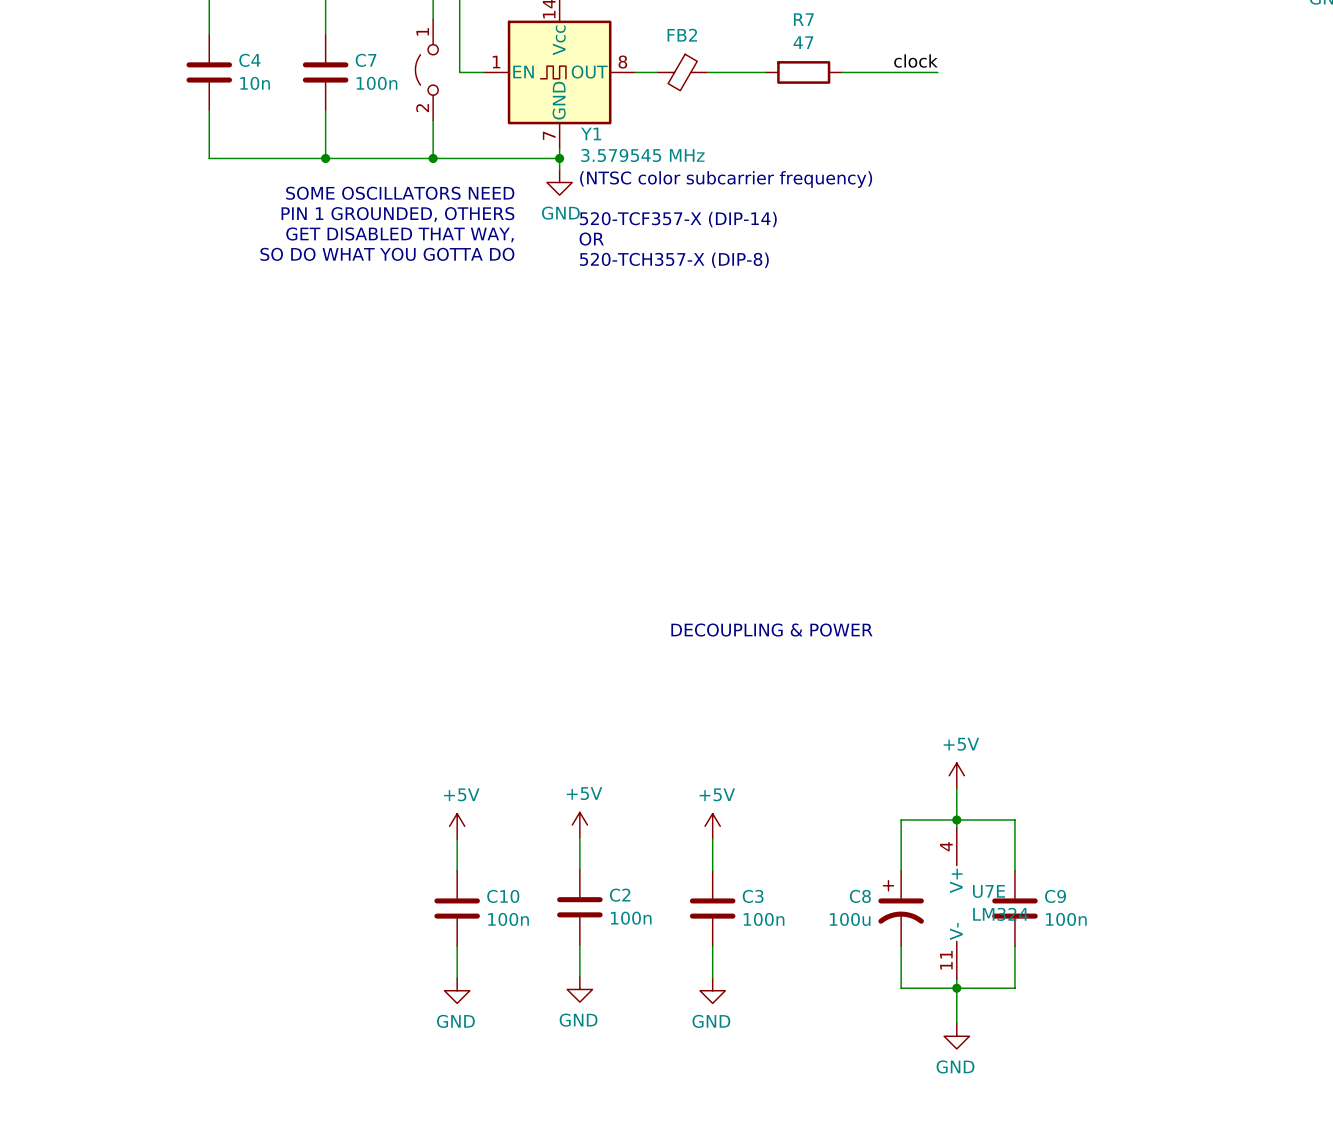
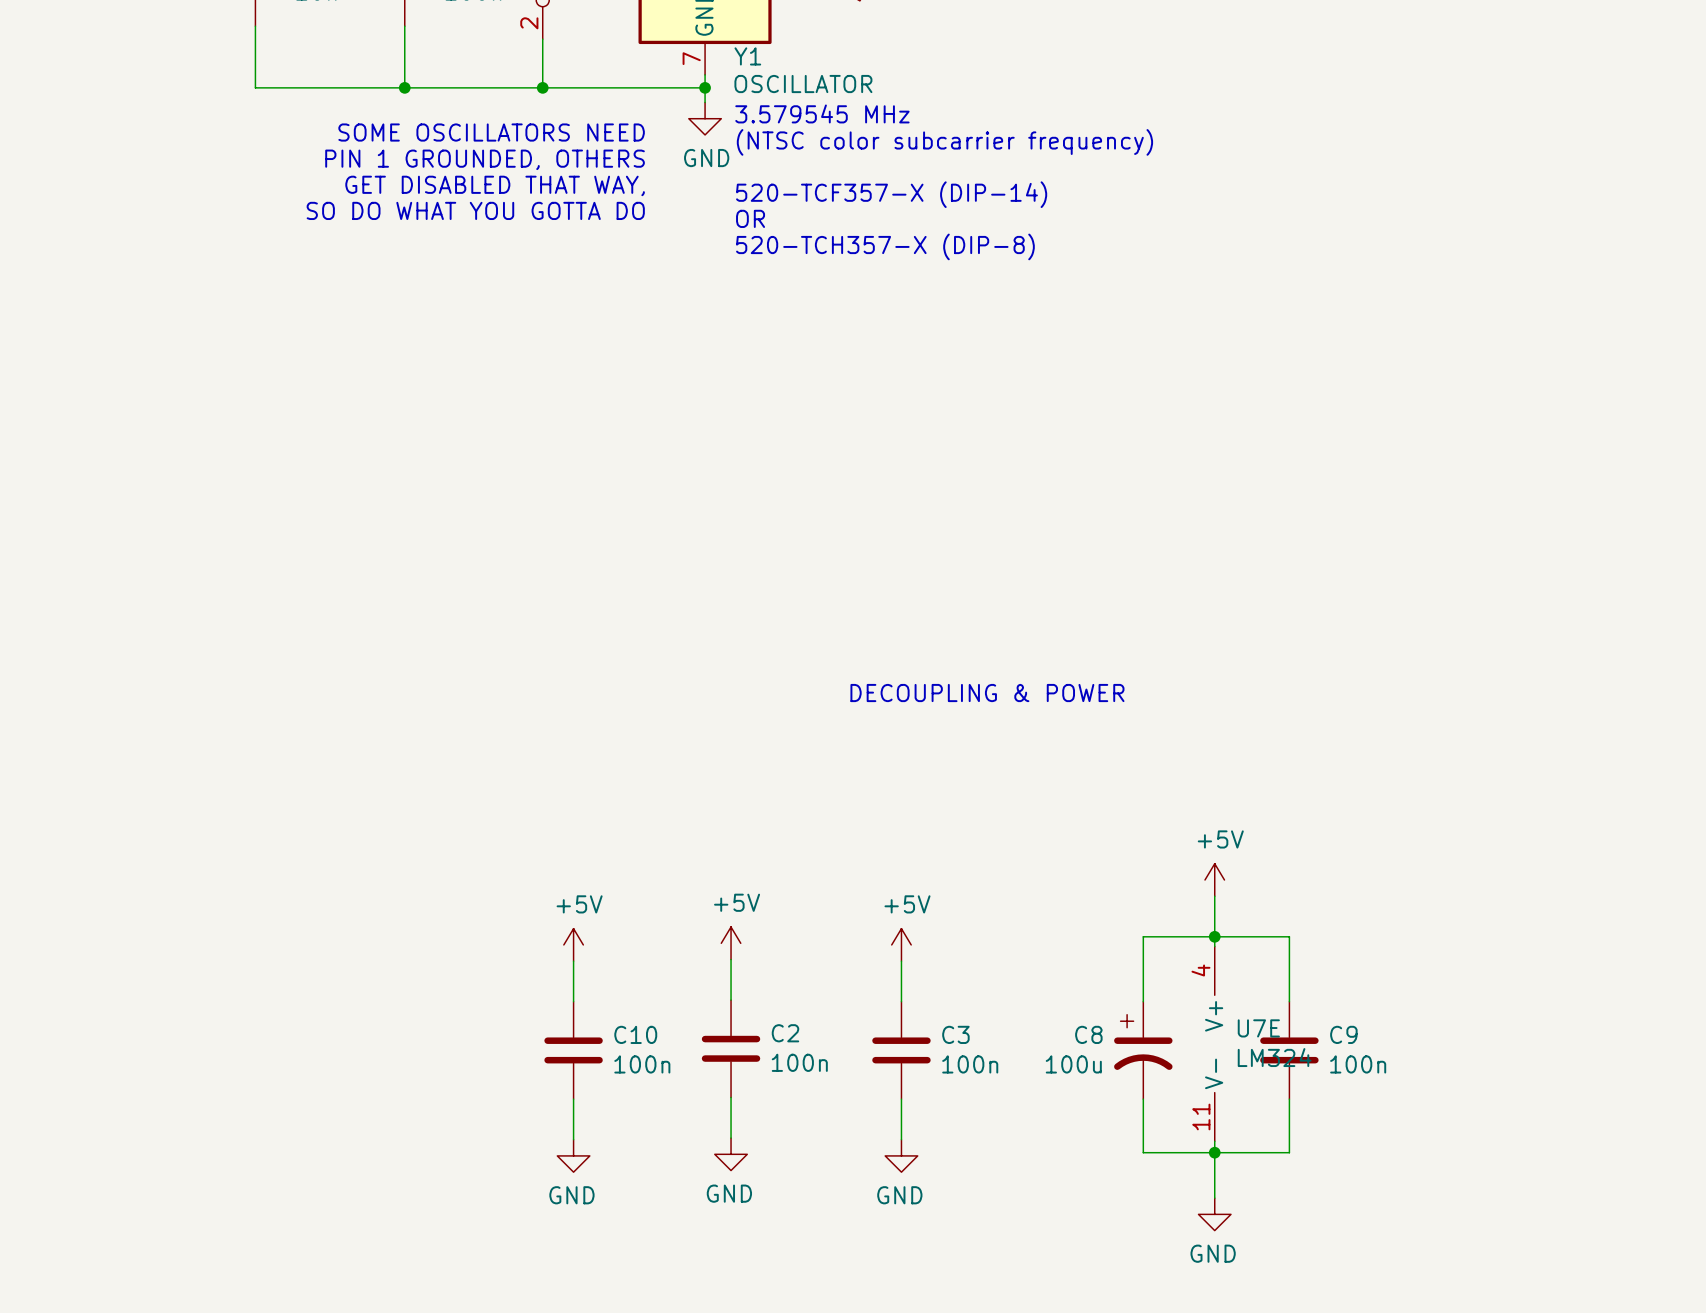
Y1 value: 3.579545 MHz (642, 155) -> OSCILLATOR (803, 84)
text: (NTSC color subcarrier frequency) (726, 179) -> 3.579545 MHz (822, 113)
text: none -> (NTSC color subcarrier frequency) (944, 142)
text: 520-TCF357-X (DIP-14) (678, 219) -> none
text: OR (591, 239) -> 520-TCF357-X (DIP-14) (891, 194)
text: 520-TCH357-X (DIP-8) (674, 260) -> OR (750, 218)
text: none -> 520-TCH357-X (DIP-8) (885, 246)

